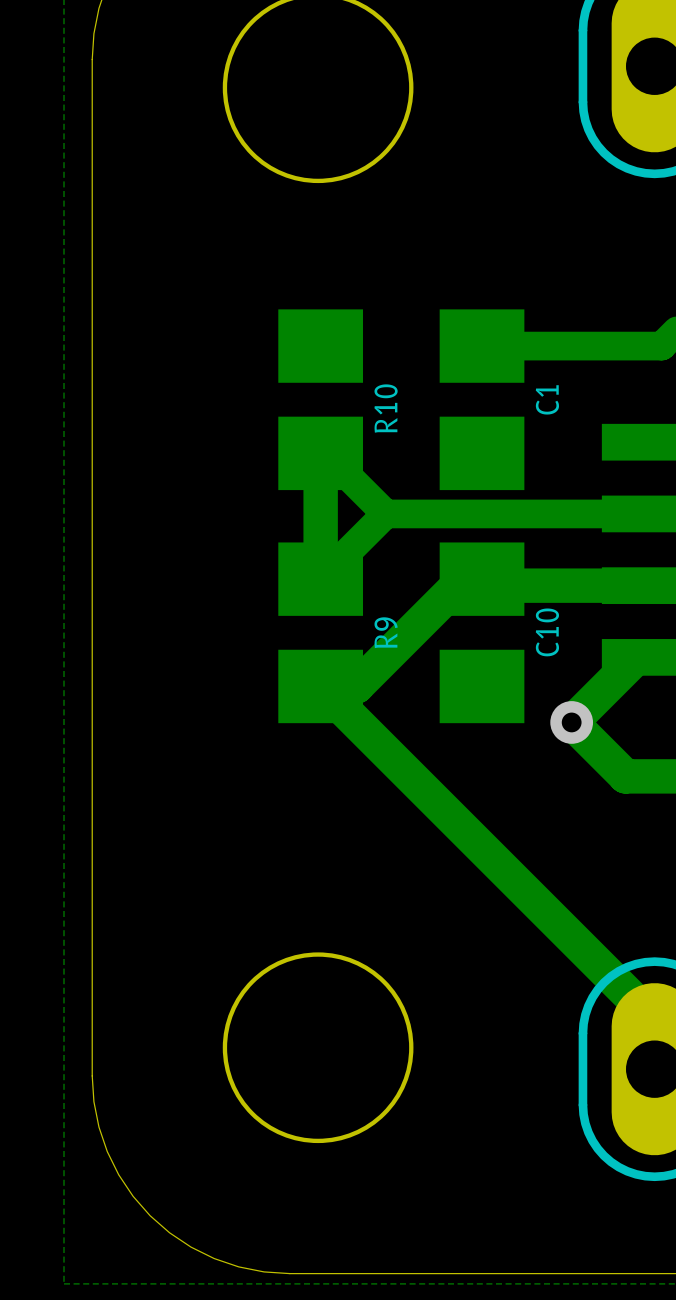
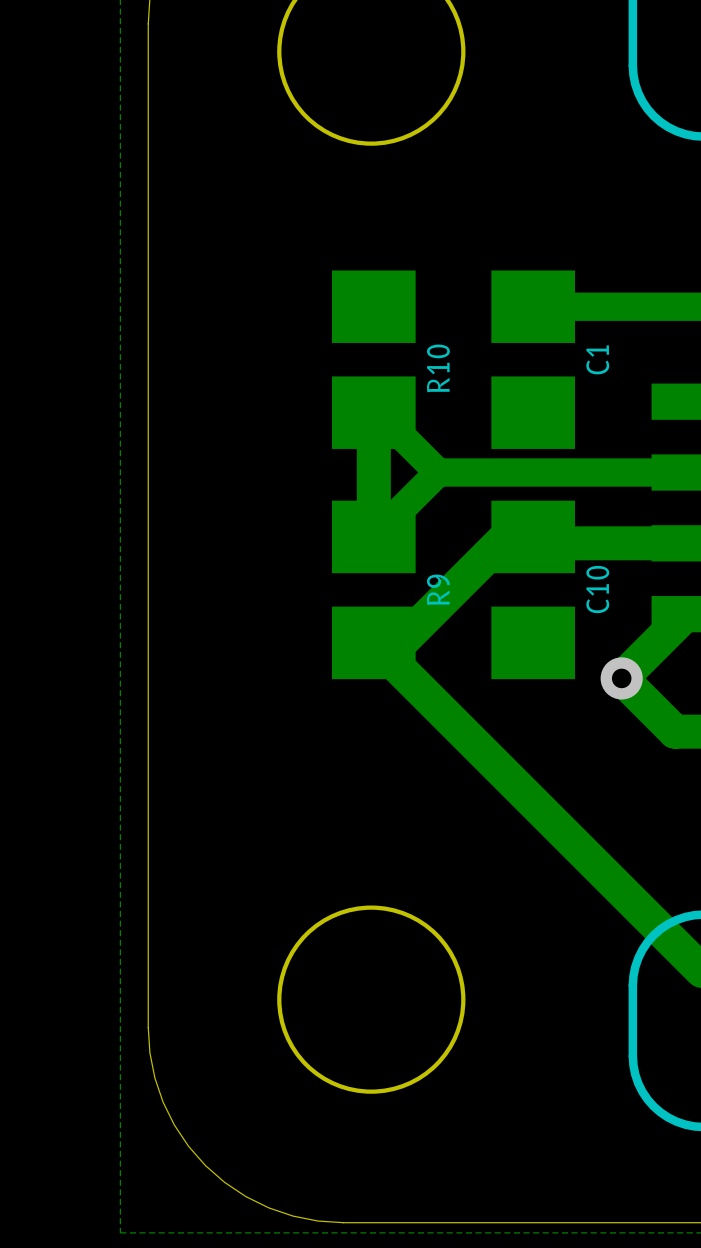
track: (463, 579) (356, 686) (320, 686) -> none
track: none -> (533, 536) (506, 536) (400, 643)

